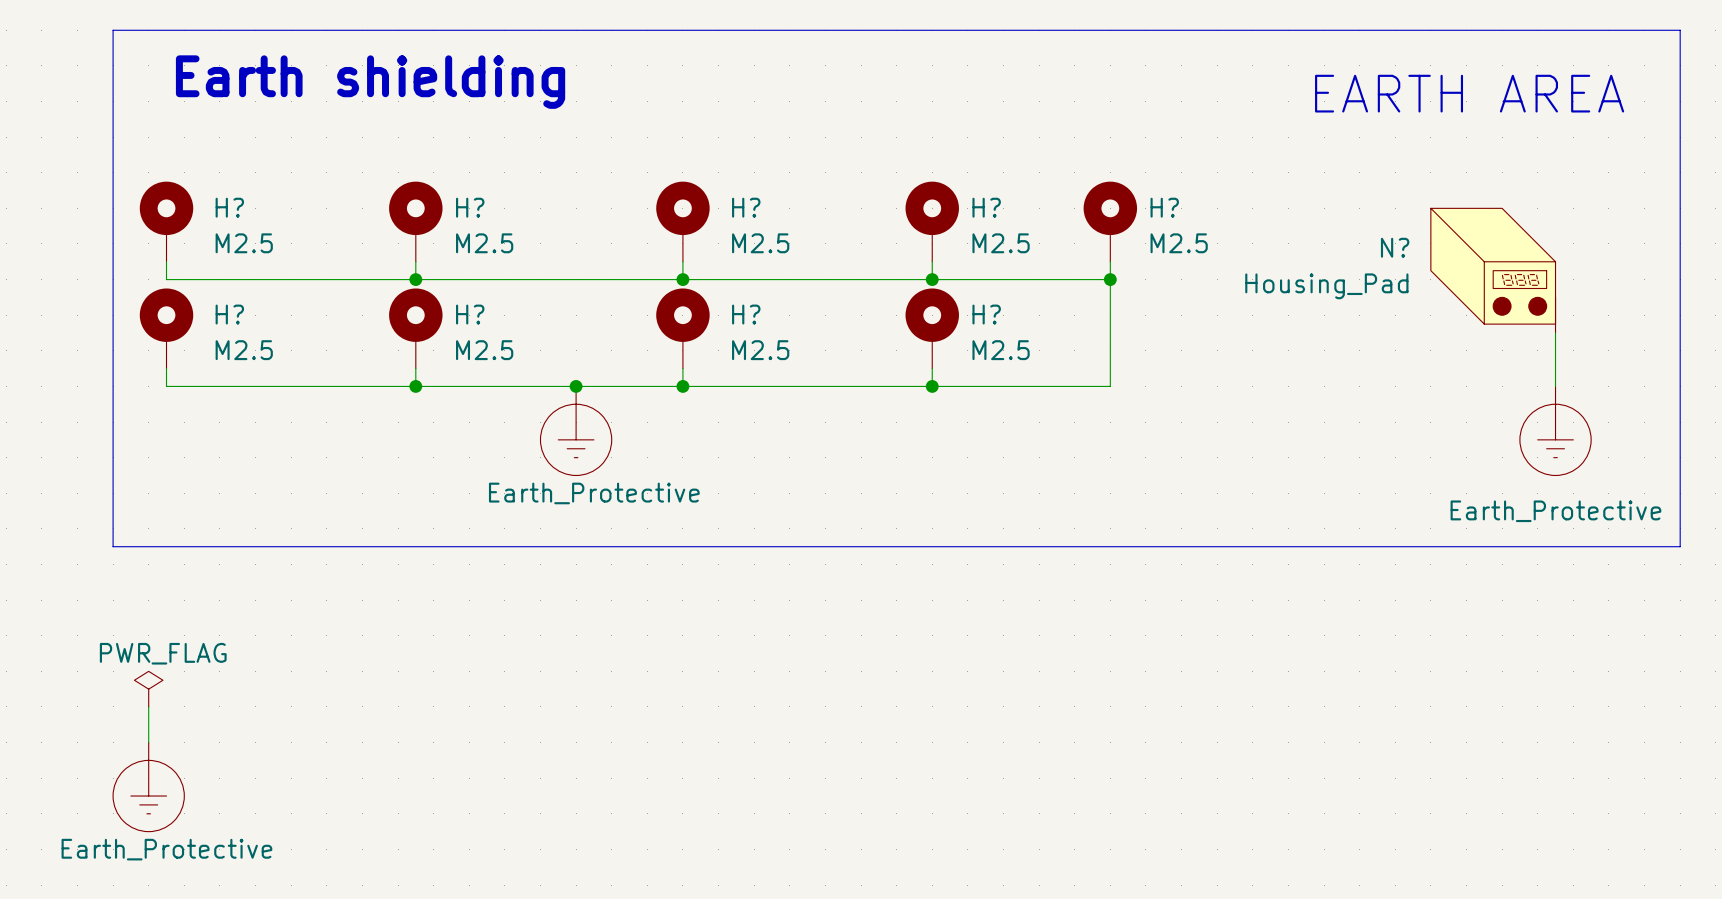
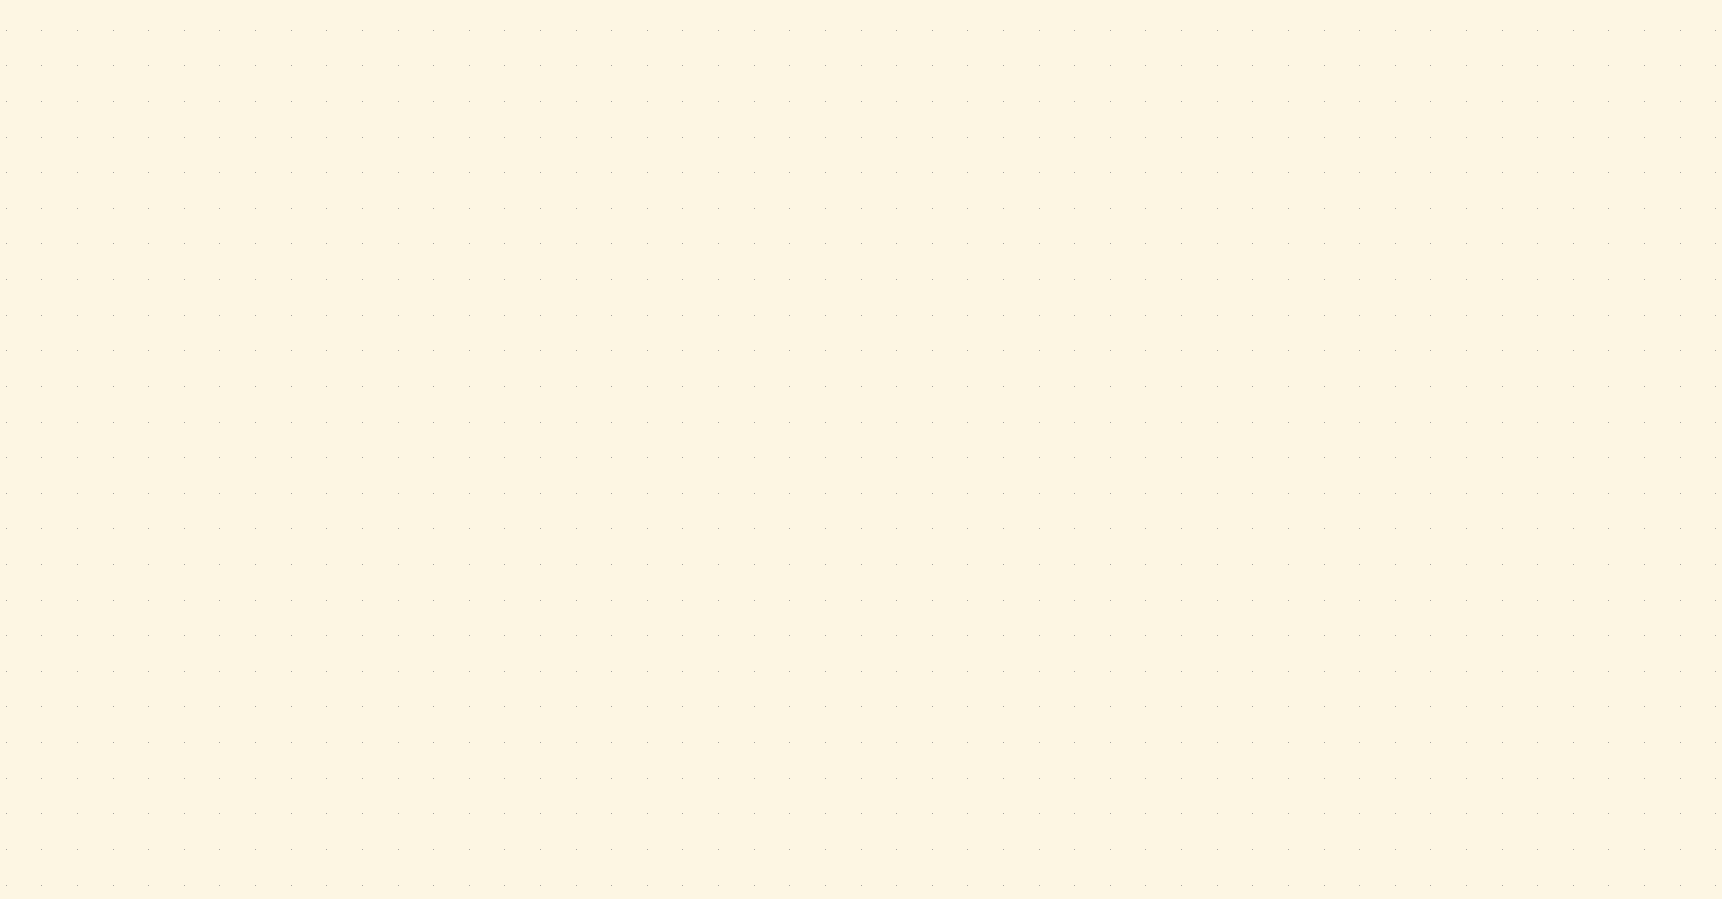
line: (113, 30) (1680, 30) (1680, 546) (113, 546) (113, 30) -> none
text: Earth shielding (370, 82) -> none
text: EARTH AREA (1469, 93) -> none
H?: M2.5 (166, 221) -> none
H?: M2.5 (415, 221) -> none
H?: M2.5 (682, 221) -> none
H?: M2.5 (932, 221) -> none
H?: M2.5 (1110, 221) -> none
wire: (166, 261) (166, 279) (1110, 279) -> none
wire: (415, 261) (415, 279) -> none
wire: (682, 261) (682, 279) -> none
wire: (932, 261) (932, 279) -> none
wire: (1110, 261) (1110, 386) (166, 386) (166, 368) -> none
N?: Housing_Pad (1493, 270) -> none
junction: (415, 279) -> none
junction: (682, 279) -> none
junction: (932, 279) -> none
junction: (1110, 279) -> none
H?: M2.5 (166, 328) -> none
H?: M2.5 (415, 328) -> none
H?: M2.5 (682, 328) -> none
H?: M2.5 (932, 328) -> none
wire: (1555, 333) (1555, 386) -> none
wire: (415, 368) (415, 386) -> none
wire: (682, 368) (682, 386) -> none
wire: (932, 368) (932, 386) -> none
junction: (415, 386) -> none
junction: (576, 386) -> none
junction: (682, 386) -> none
junction: (932, 386) -> none
power symbol: Earth_Protective (576, 430) -> none
power symbol: Earth_Protective (1555, 430) -> none
power symbol: PWR_FLAG (148, 689) -> none
wire: (148, 706) (148, 742) -> none
power symbol: Earth_Protective (148, 787) -> none

